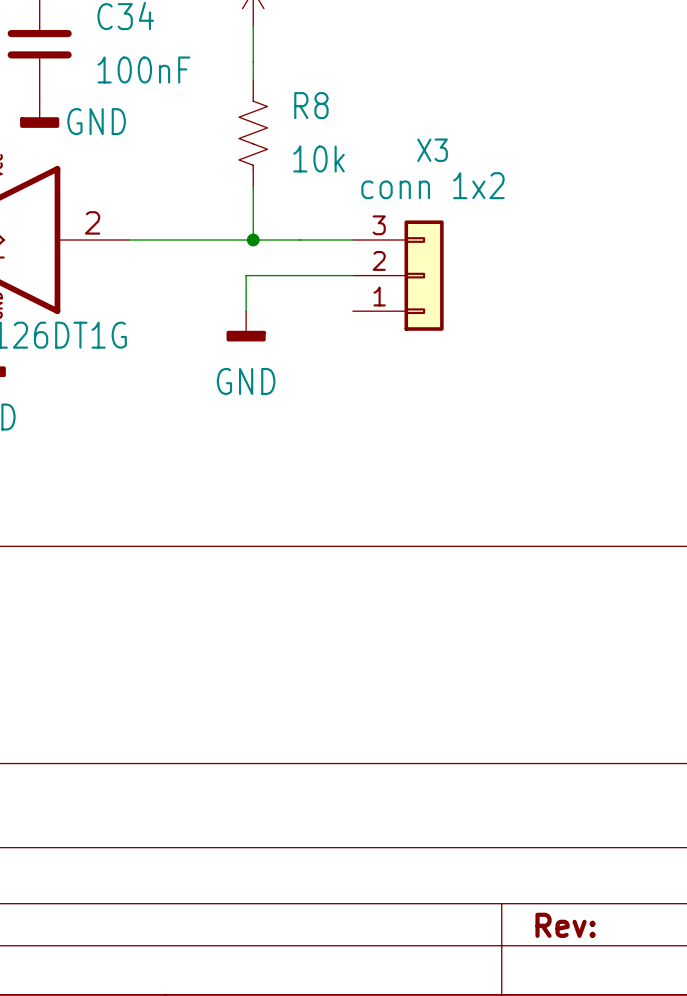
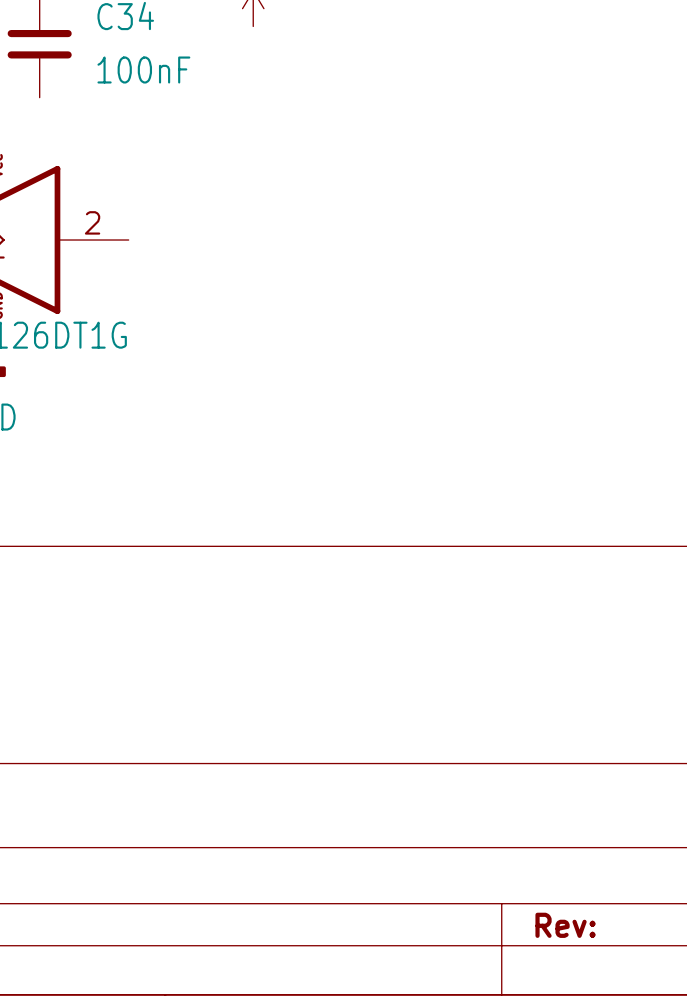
wire: (253, 26) (253, 79) -> none
power symbol: GND (39, 112) -> none
R8: 10k (253, 133) -> none
wire: (253, 186) (253, 240) -> none
wire: (128, 240) (352, 240) -> none
junction: (253, 240) -> none
wire: (352, 275) (246, 275) (246, 311) -> none
X3: conn 1x2 (398, 275) -> none
power symbol: GND (246, 326) -> none

